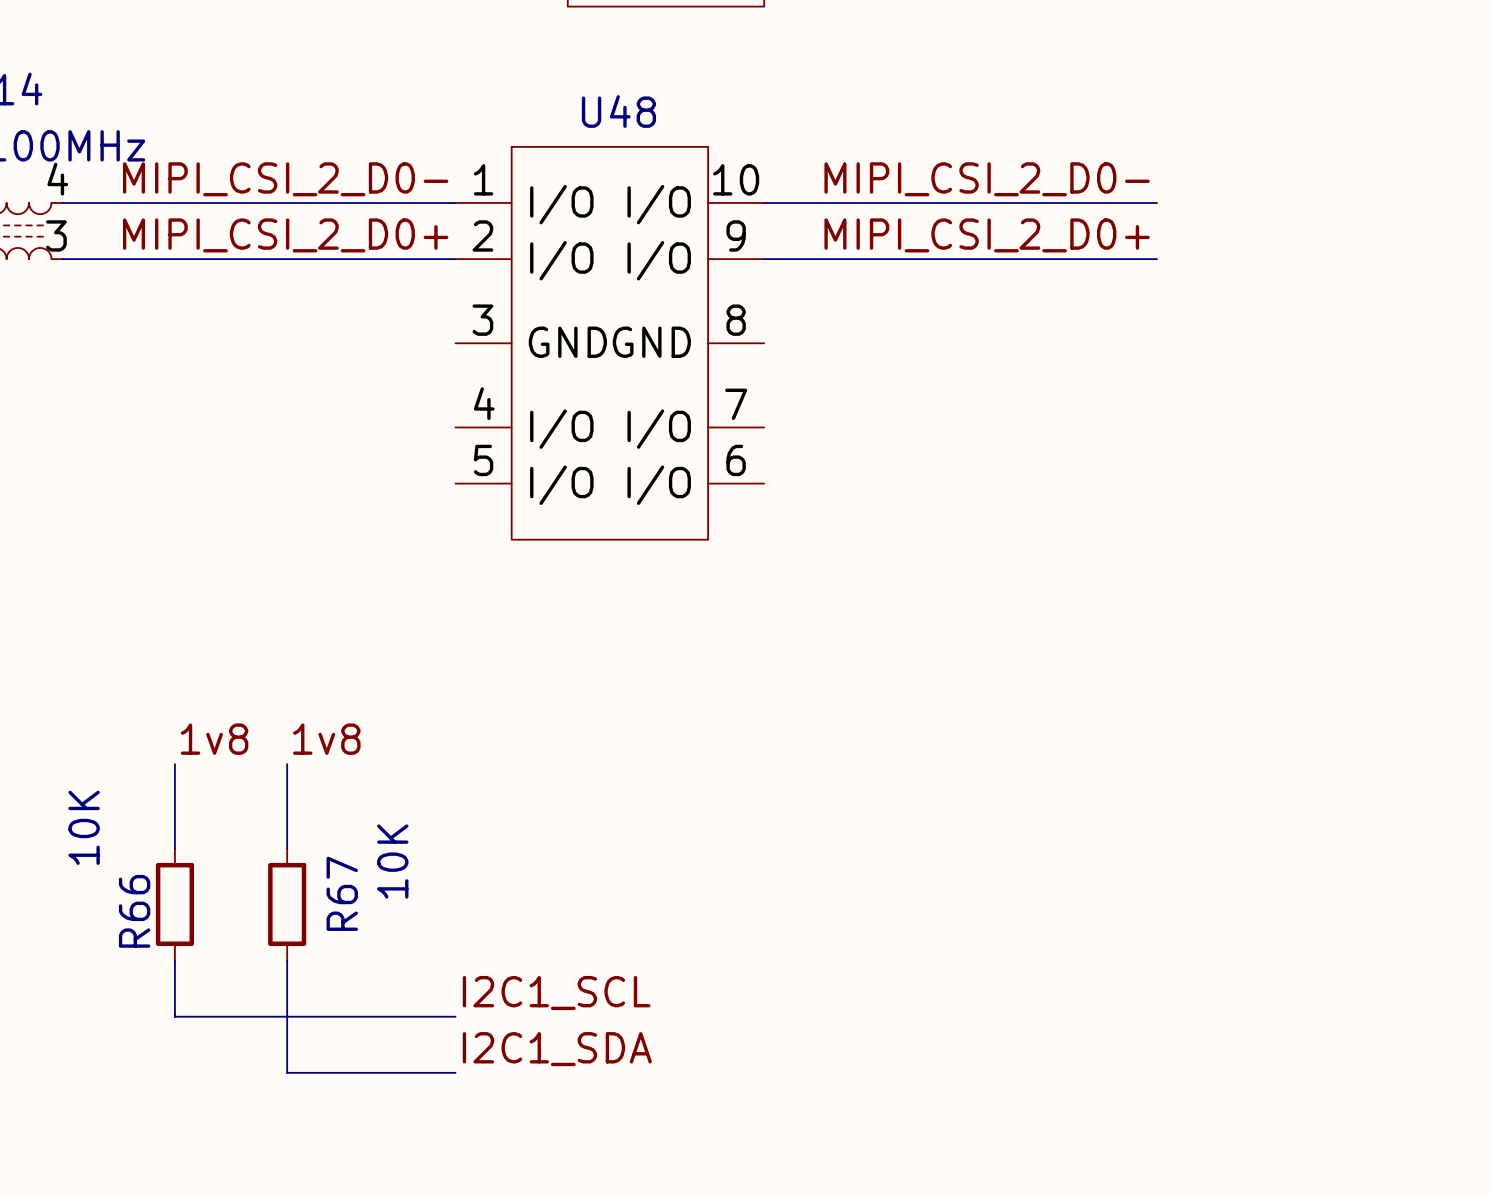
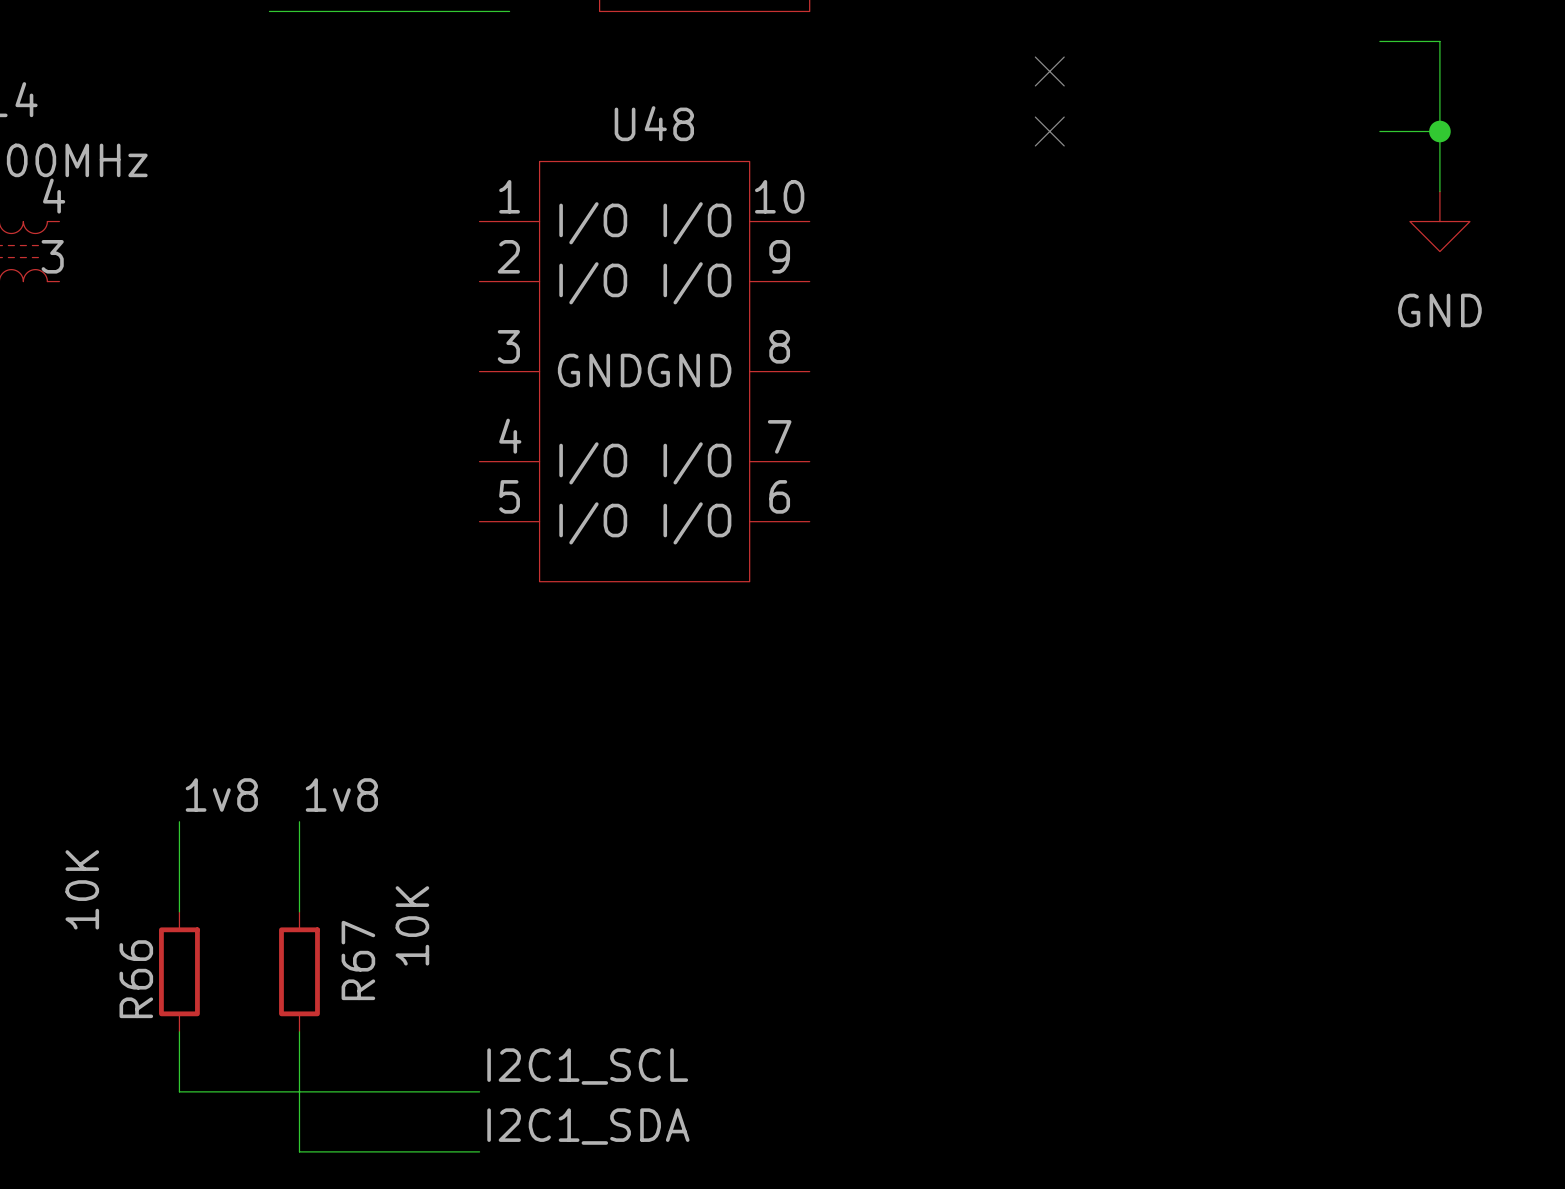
wire: none -> (269, 11) (509, 11)
wire: none -> (1379, 41) (1439, 41) (1439, 191)
no-connect mark: none -> (1049, 71)
no-connect mark: none -> (1049, 131)
wire: none -> (1379, 131) (1439, 131)
junction: none -> (1439, 131)
label: MIPI_CSI_2_D0- (285, 179) -> none
label: MIPI_CSI_2_D0- (987, 179) -> none
wire: (62, 203) (455, 203) -> none
wire: (764, 203) (1157, 203) -> none
power symbol: none -> GND (1439, 221)
label: MIPI_CSI_2_D0+ (285, 235) -> none
label: MIPI_CSI_2_D0+ (987, 235) -> none
wire: (62, 259) (455, 259) -> none
wire: (764, 259) (1157, 259) -> none

